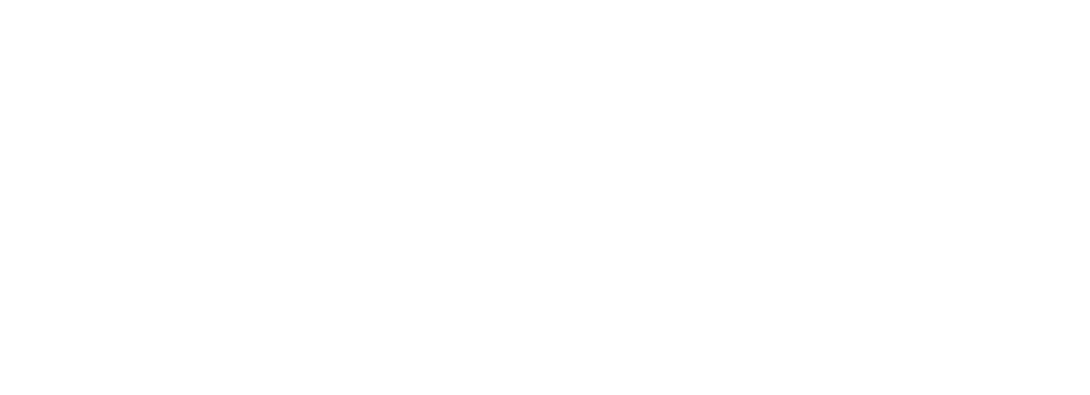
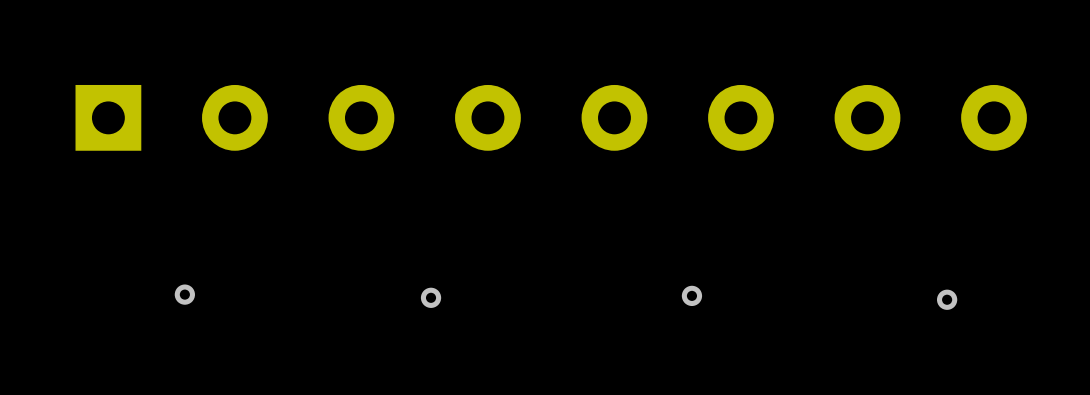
part: none -> (551, 117)
via: none -> (184, 294)
via: none -> (691, 295)
via: none -> (431, 297)
via: none -> (947, 299)

